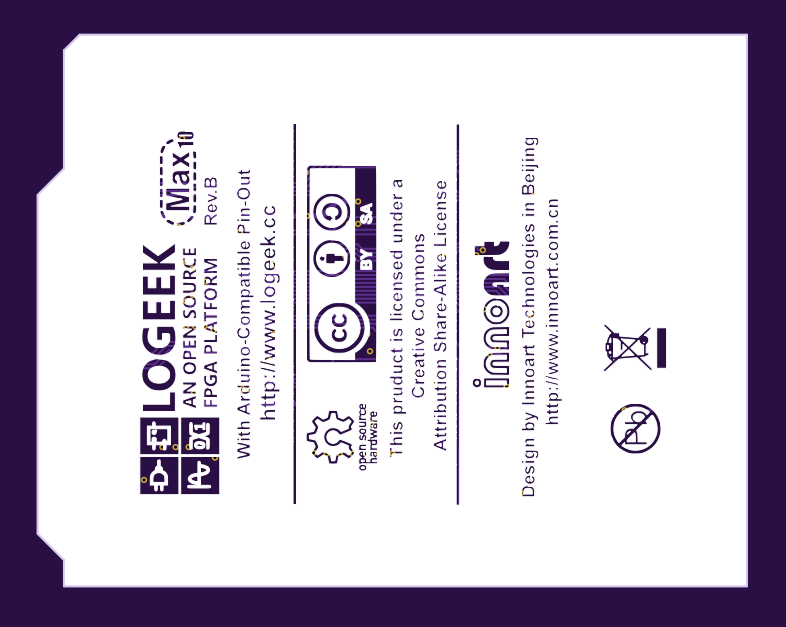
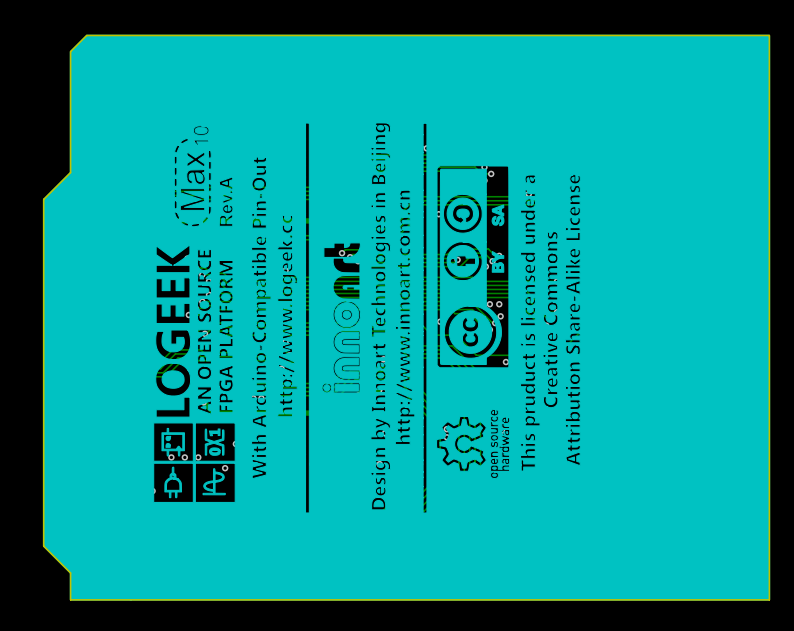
drawing shape: [36, 33, 748, 588] -> [42, 34, 771, 601]
drawing: [96, 88, 690, 533] -> none
drawing: none -> [129, 97, 603, 536]

